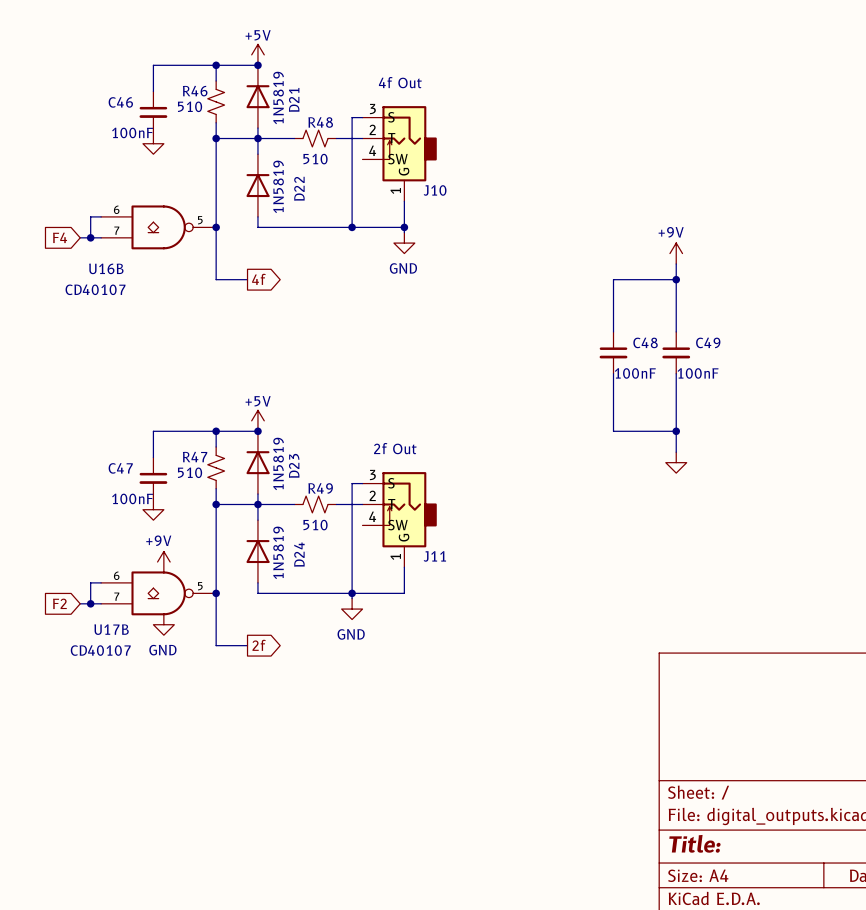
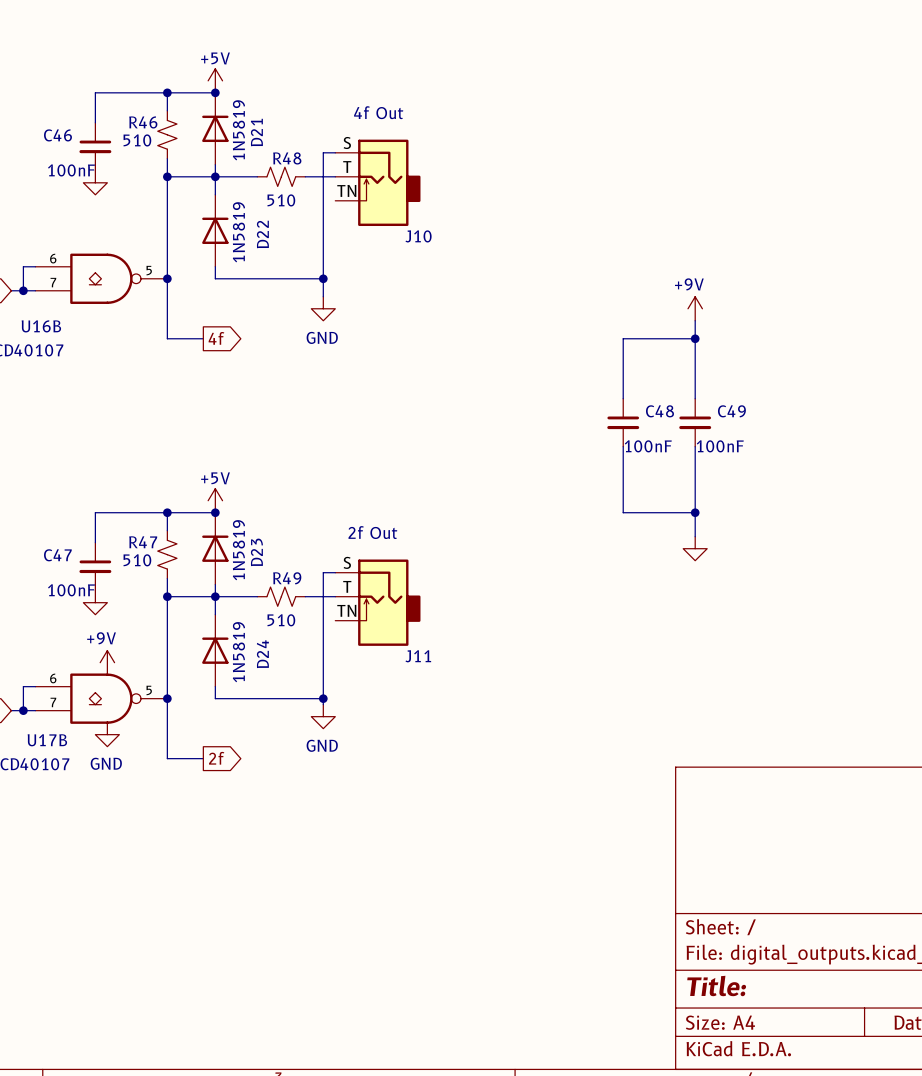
J10 symbol: [362, 106, 437, 202] -> [335, 139, 421, 227]
wire: (404, 201) (404, 232) -> none
wire: (352, 227) (404, 227) -> (323, 278) (323, 296)
junction: (404, 227) -> none
power symbol position: GND (404, 243) -> GND (323, 308)
J11 symbol: [362, 472, 437, 568] -> [335, 559, 421, 646]
wire: (404, 567) (404, 593) (352, 593) -> none

